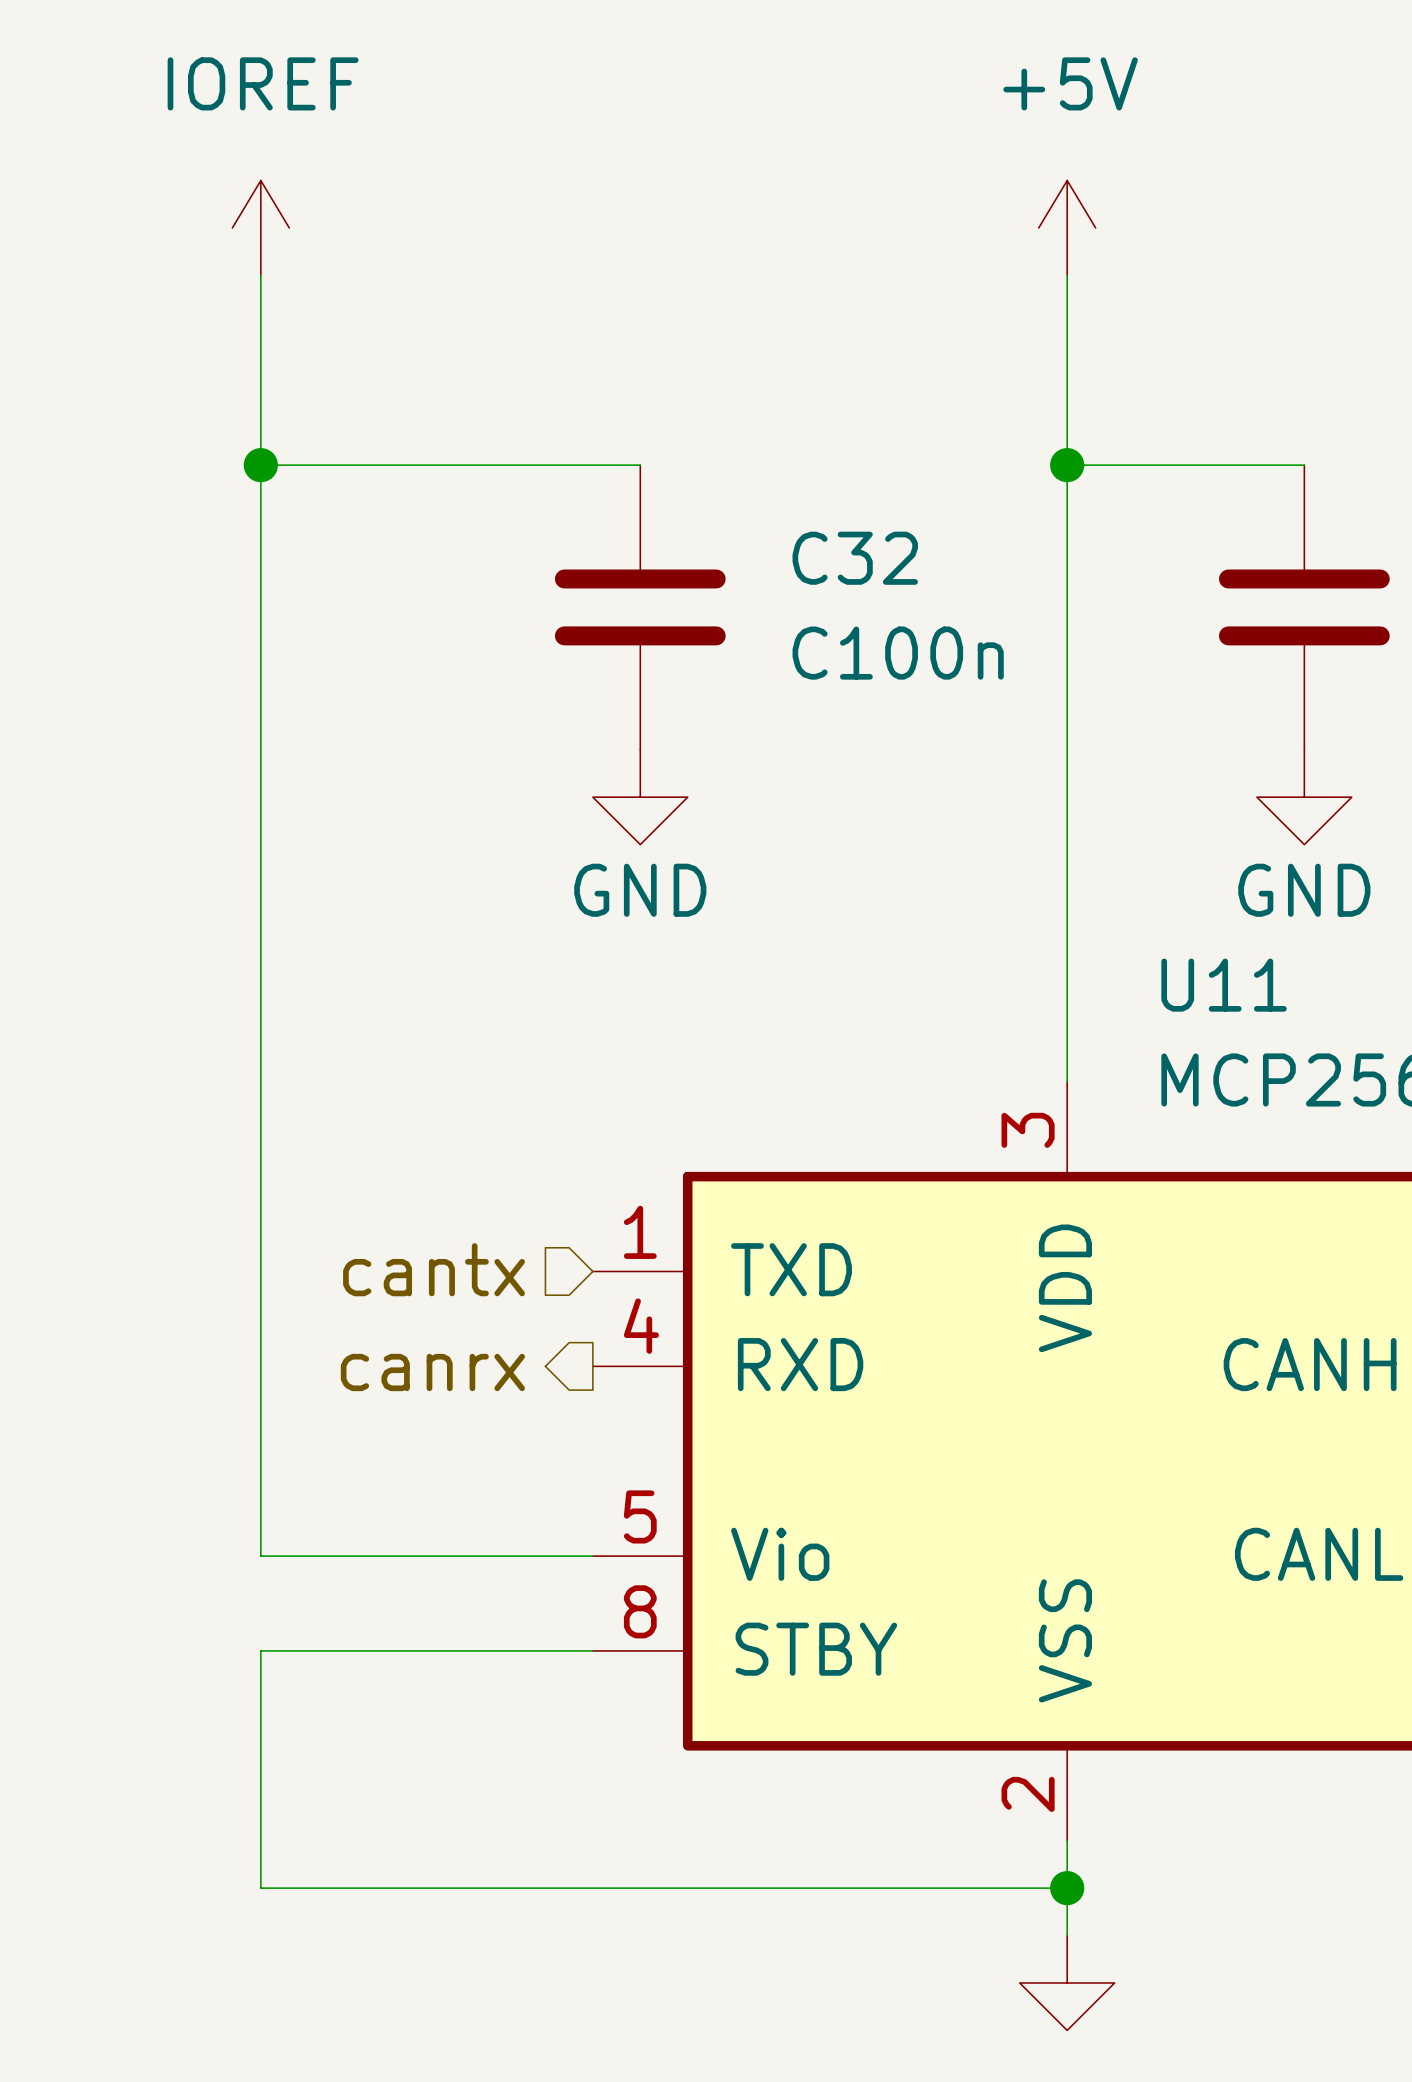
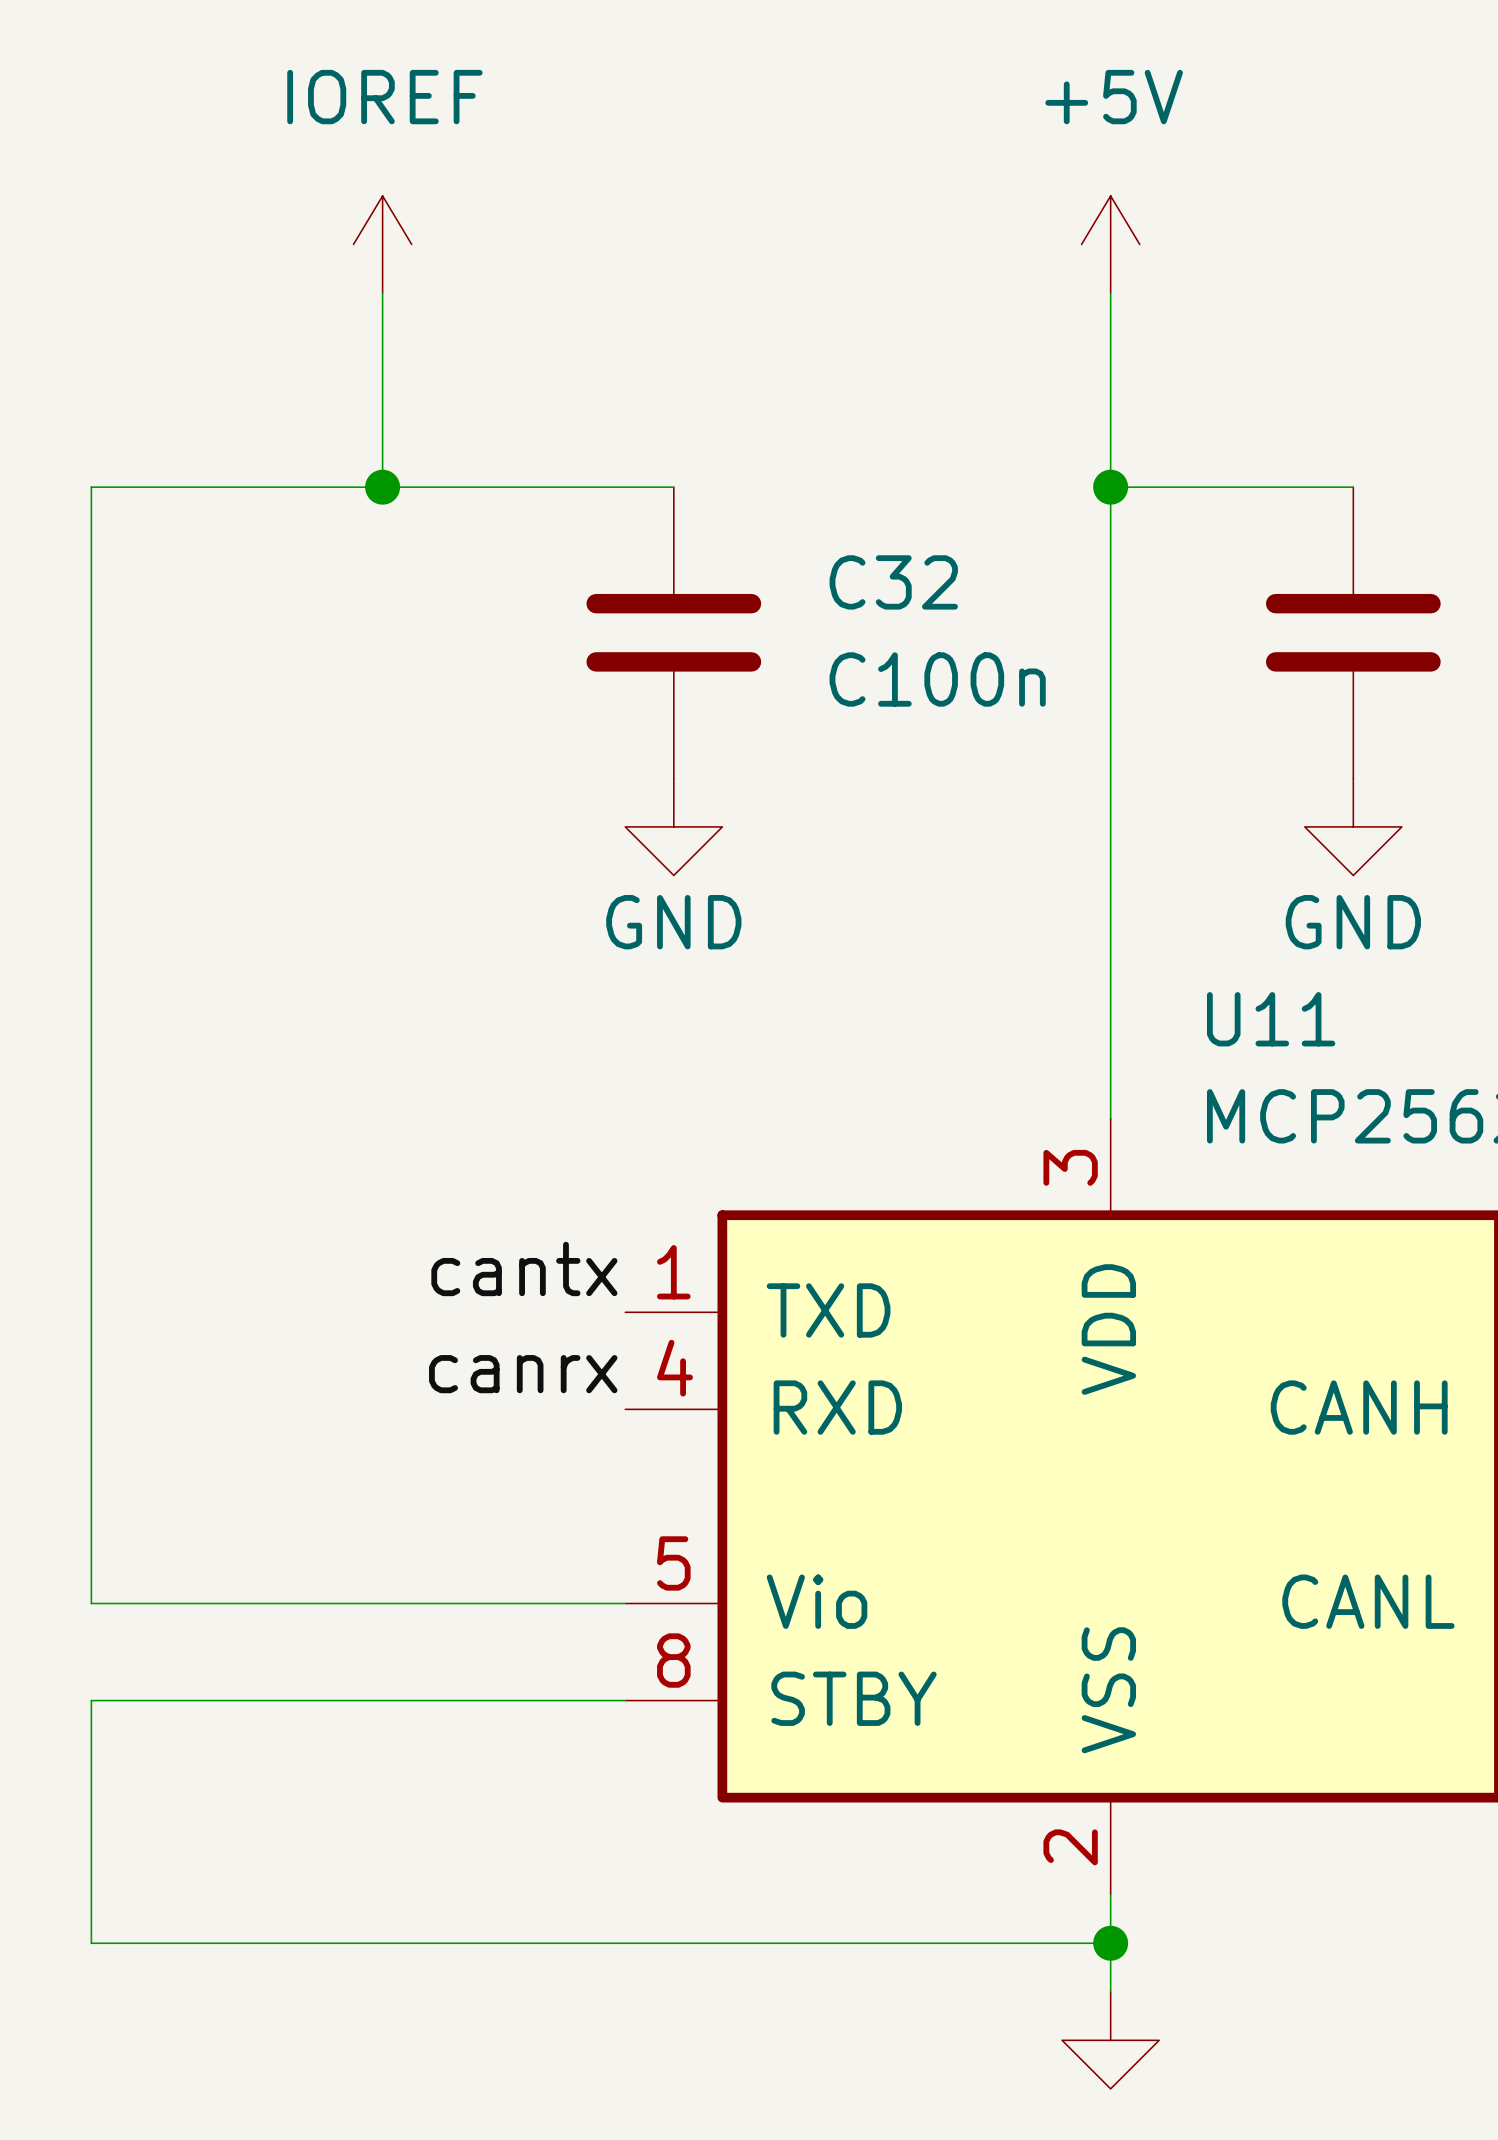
power symbol position: IOREF (260, 227) -> IOREF (382, 244)
wire: (260, 275) (260, 1556) -> (285, 487) (91, 487) (91, 1603) (285, 1603)
wire: none -> (382, 293) (382, 487)
junction position: (260, 465) -> (382, 487)
label: none -> cantx (524, 1268)
hierarchical label: cantx (434, 1269) -> none
label: none -> canrx (523, 1374)
hierarchical label: canrx (432, 1372) -> none
wire: (260, 1650) (260, 1888) -> (285, 1700) (91, 1700) (91, 1943) (285, 1943)

